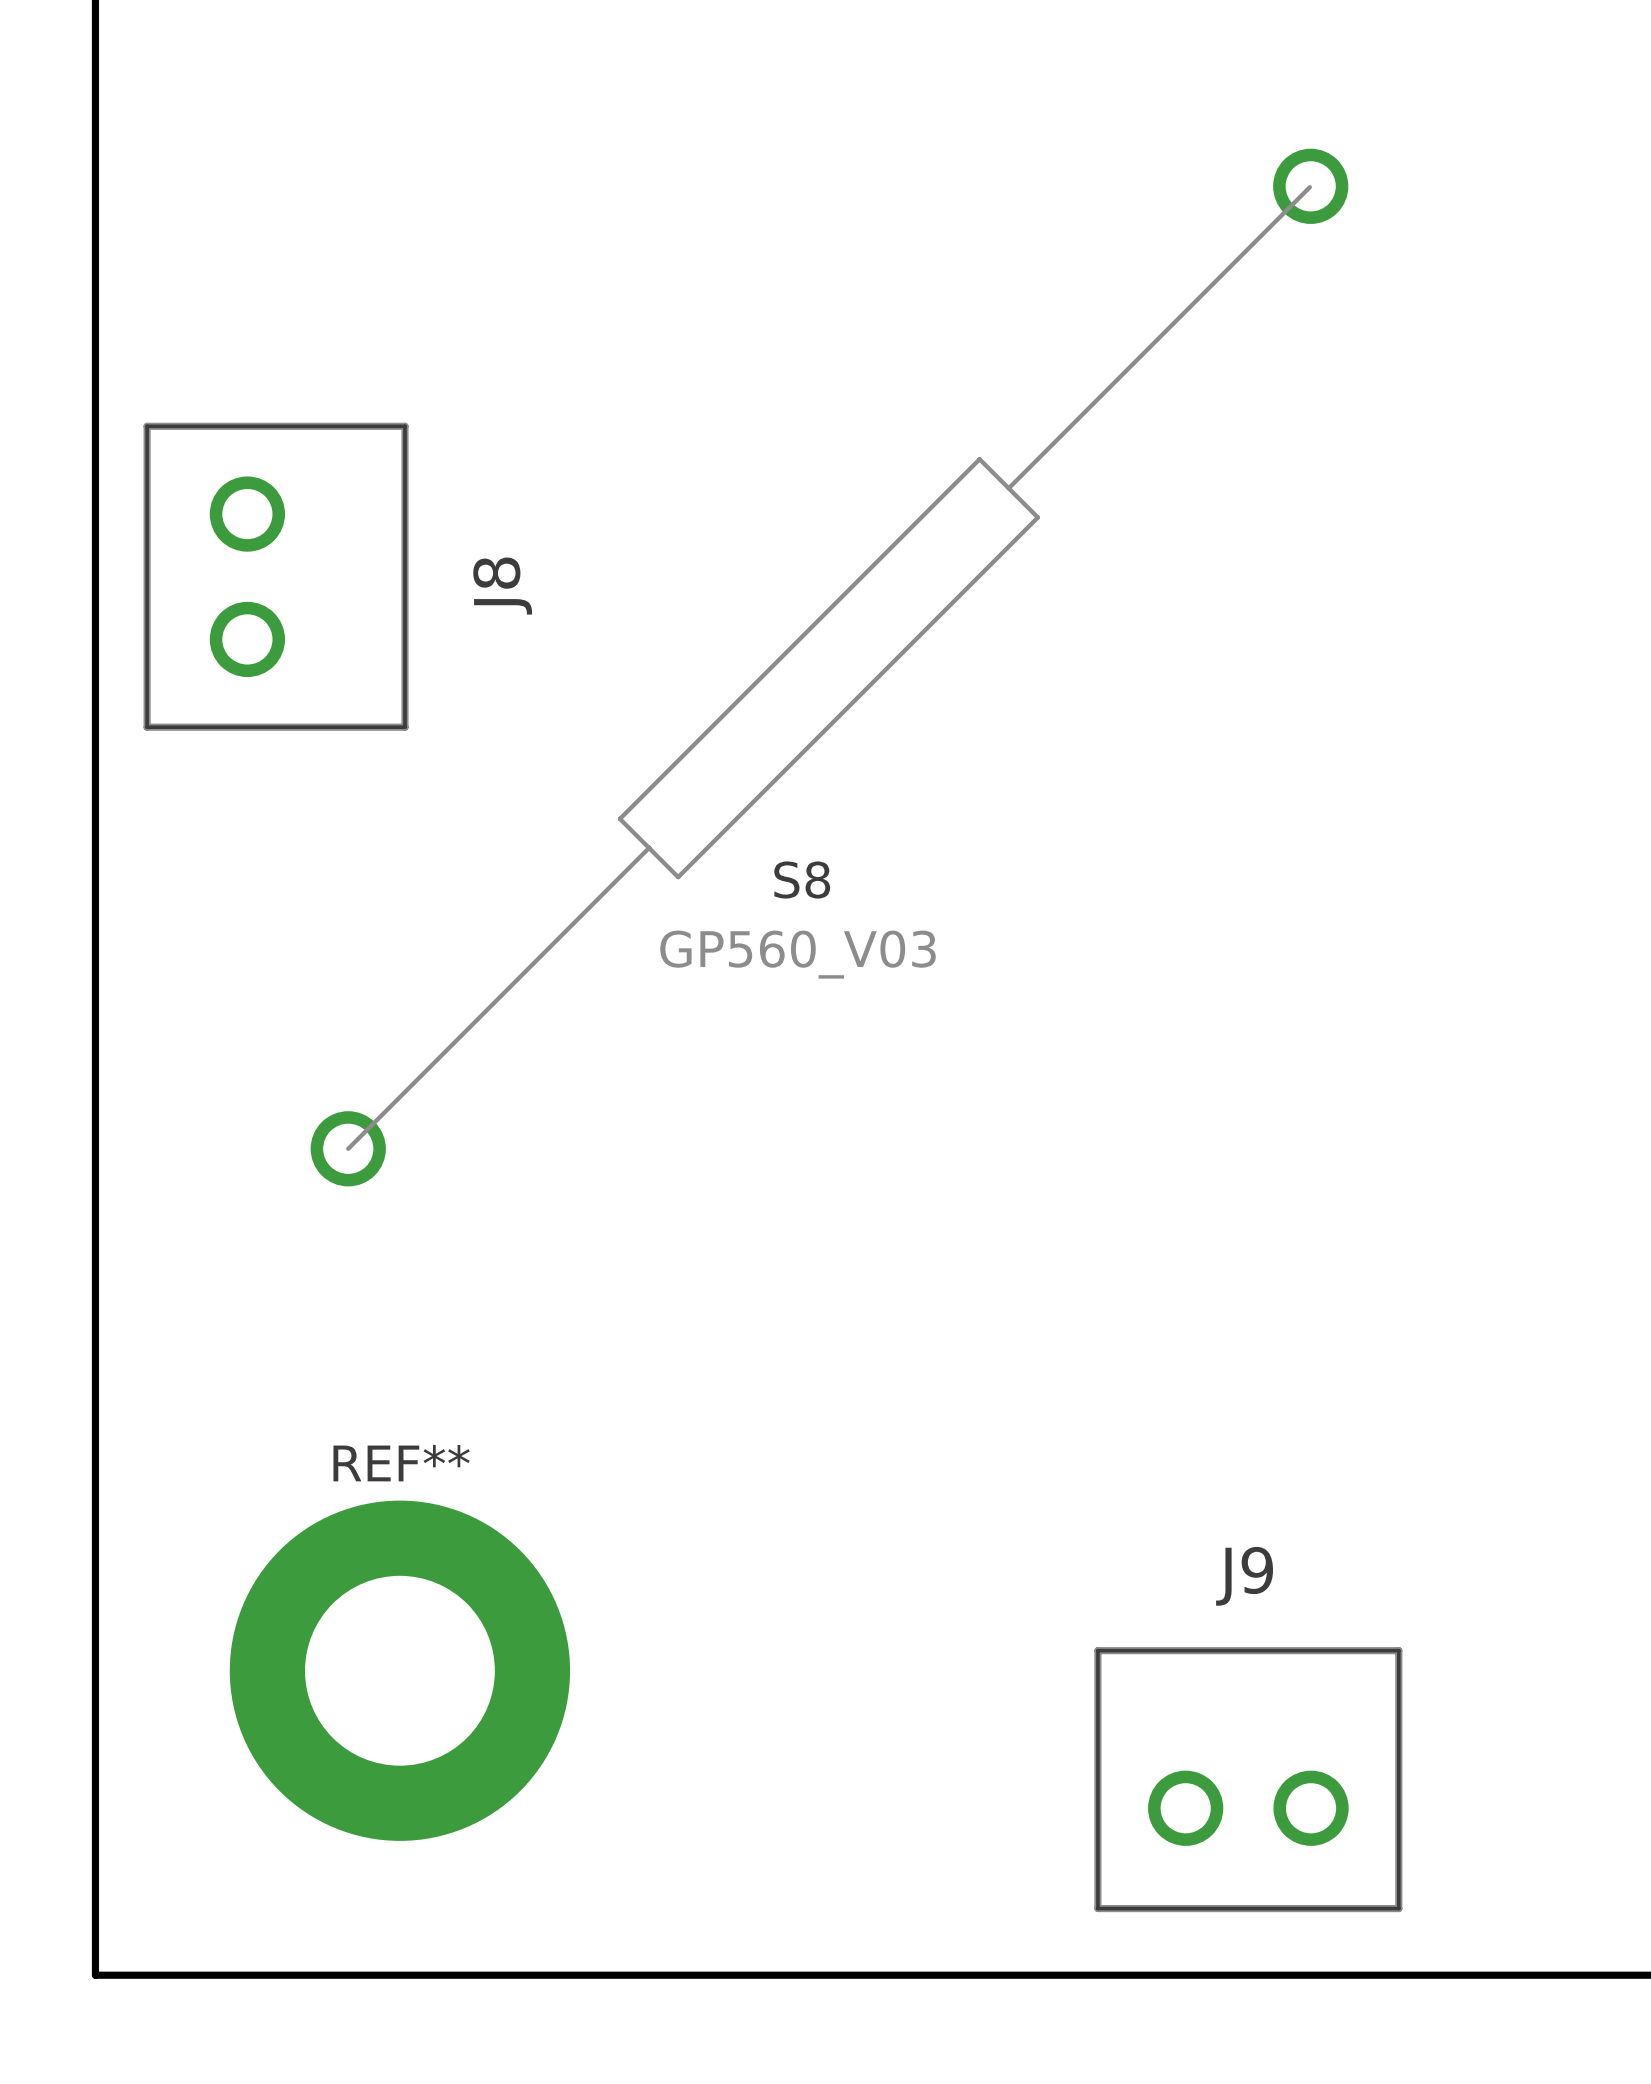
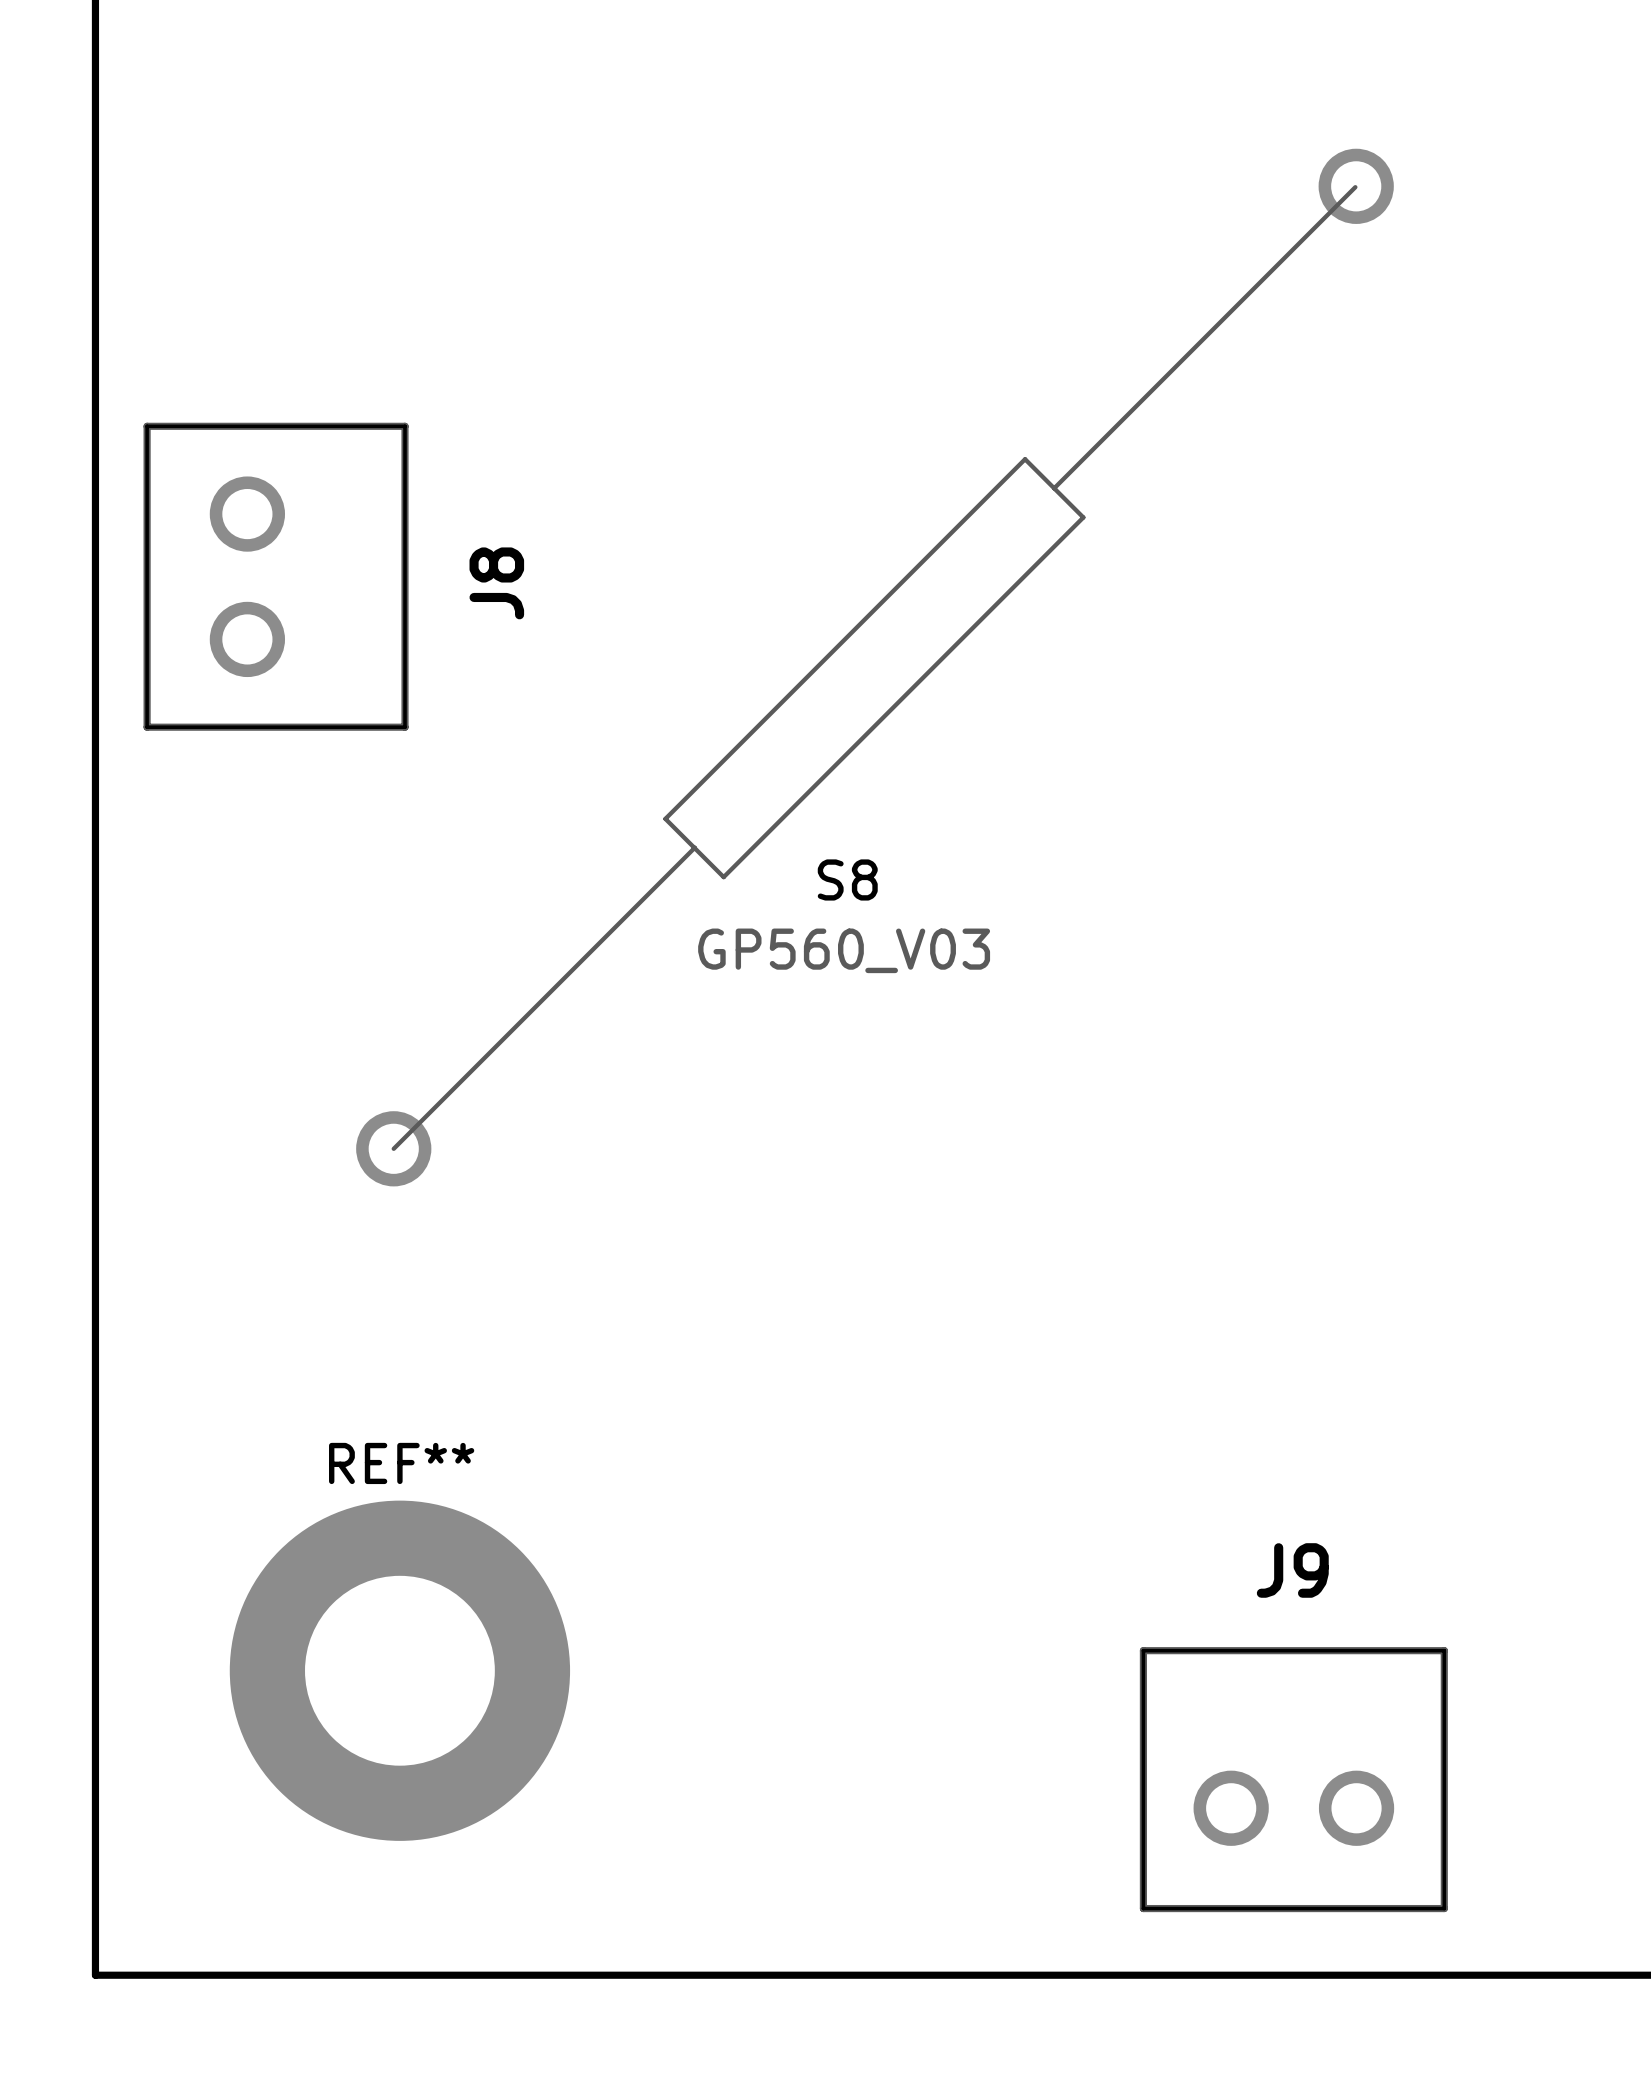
S8 position: (829, 667) -> (874, 667)
J9 position: (1248, 1779) -> (1293, 1779)

